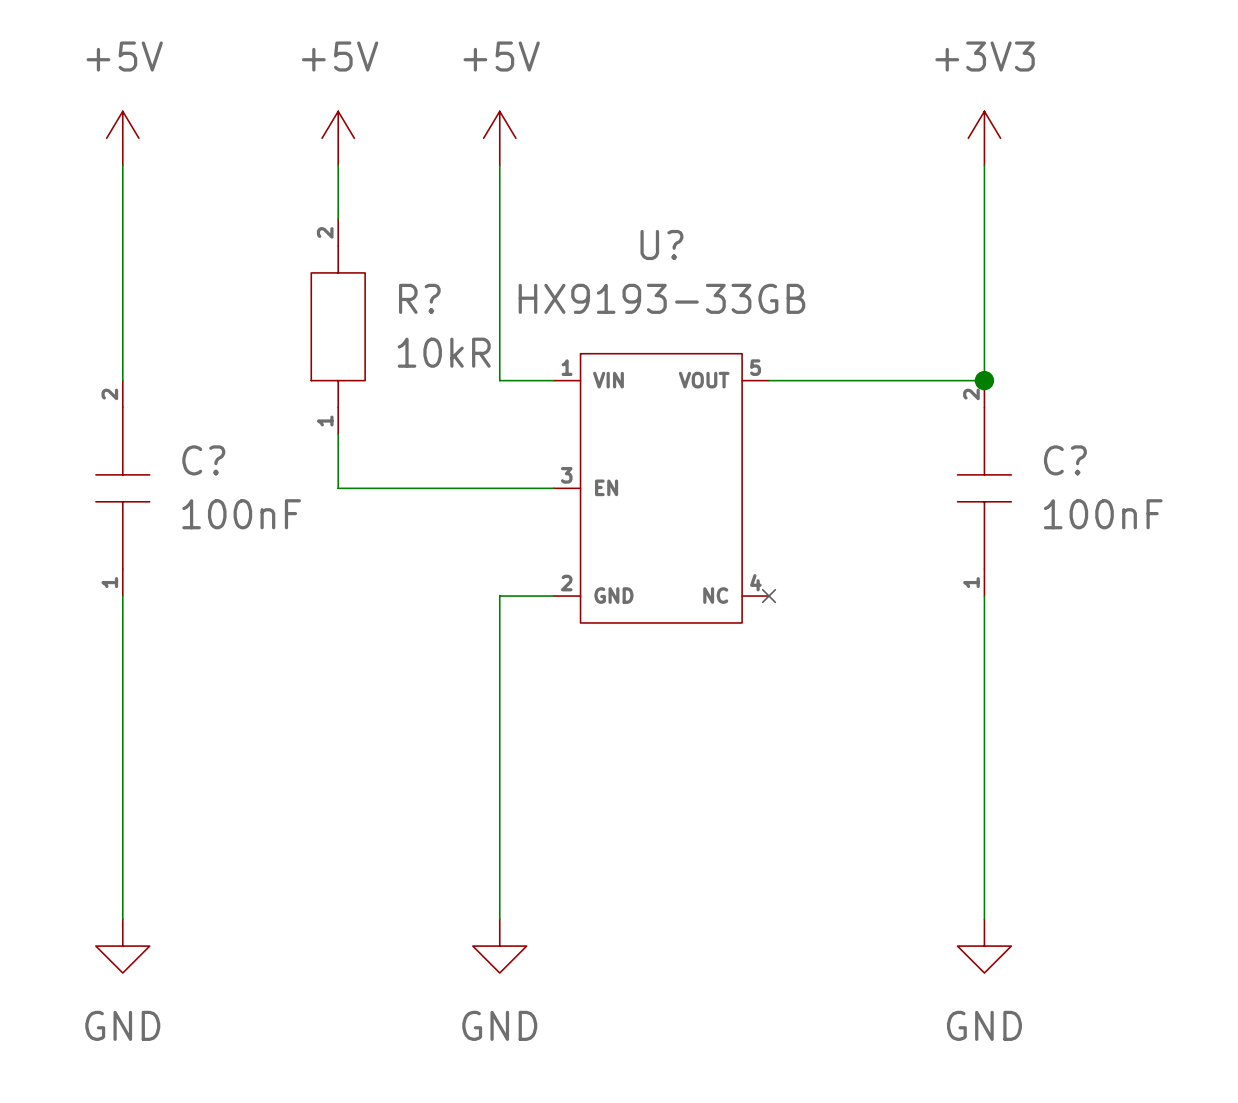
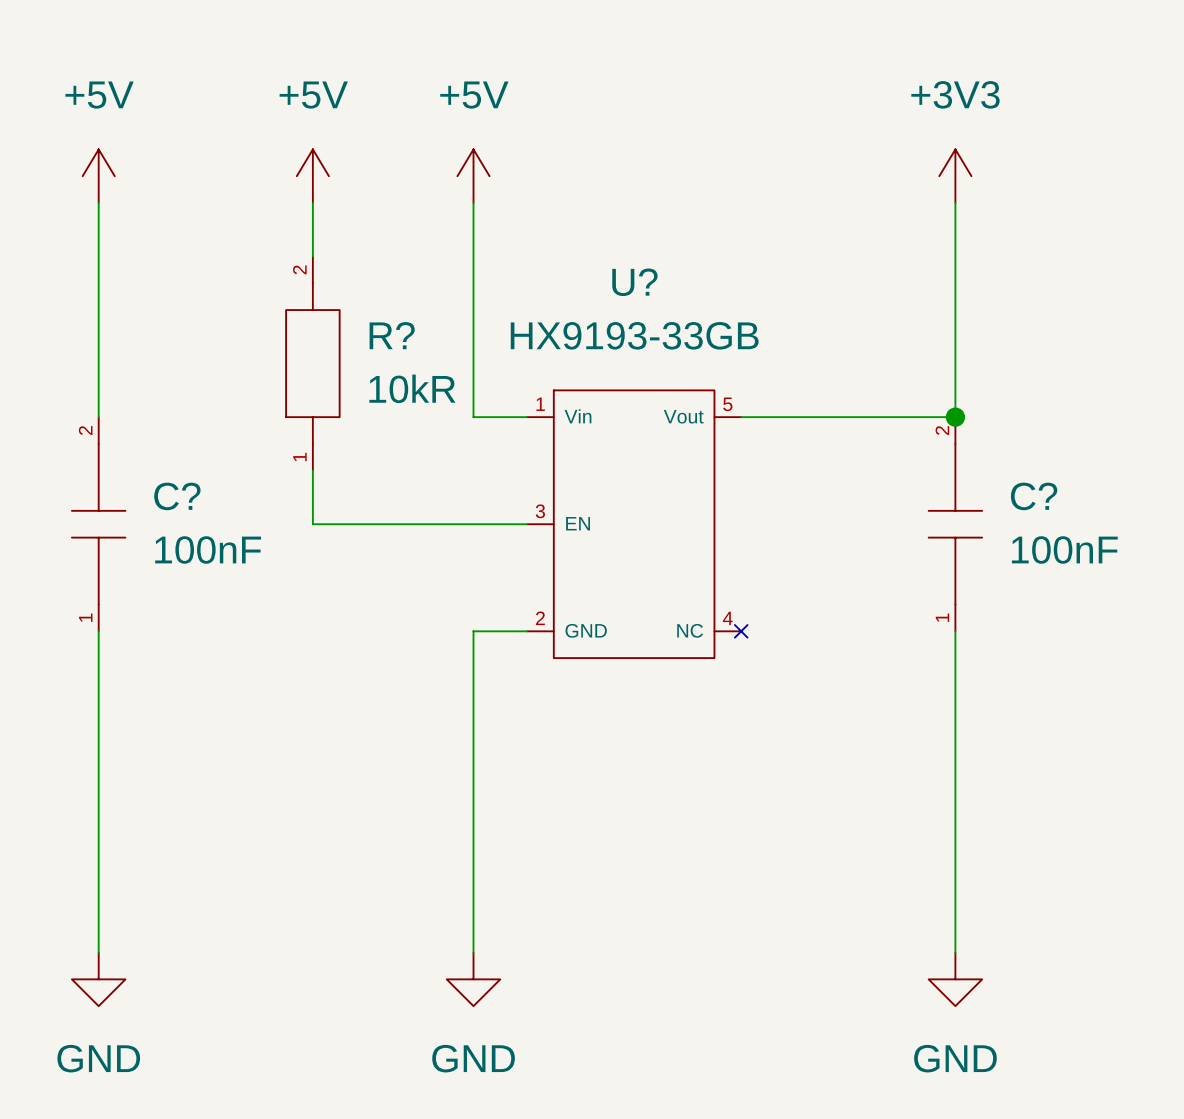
U? pin name: VIN (608, 380) -> Vin (578, 416)
U? pin name: VOUT (704, 380) -> Vout (683, 416)

